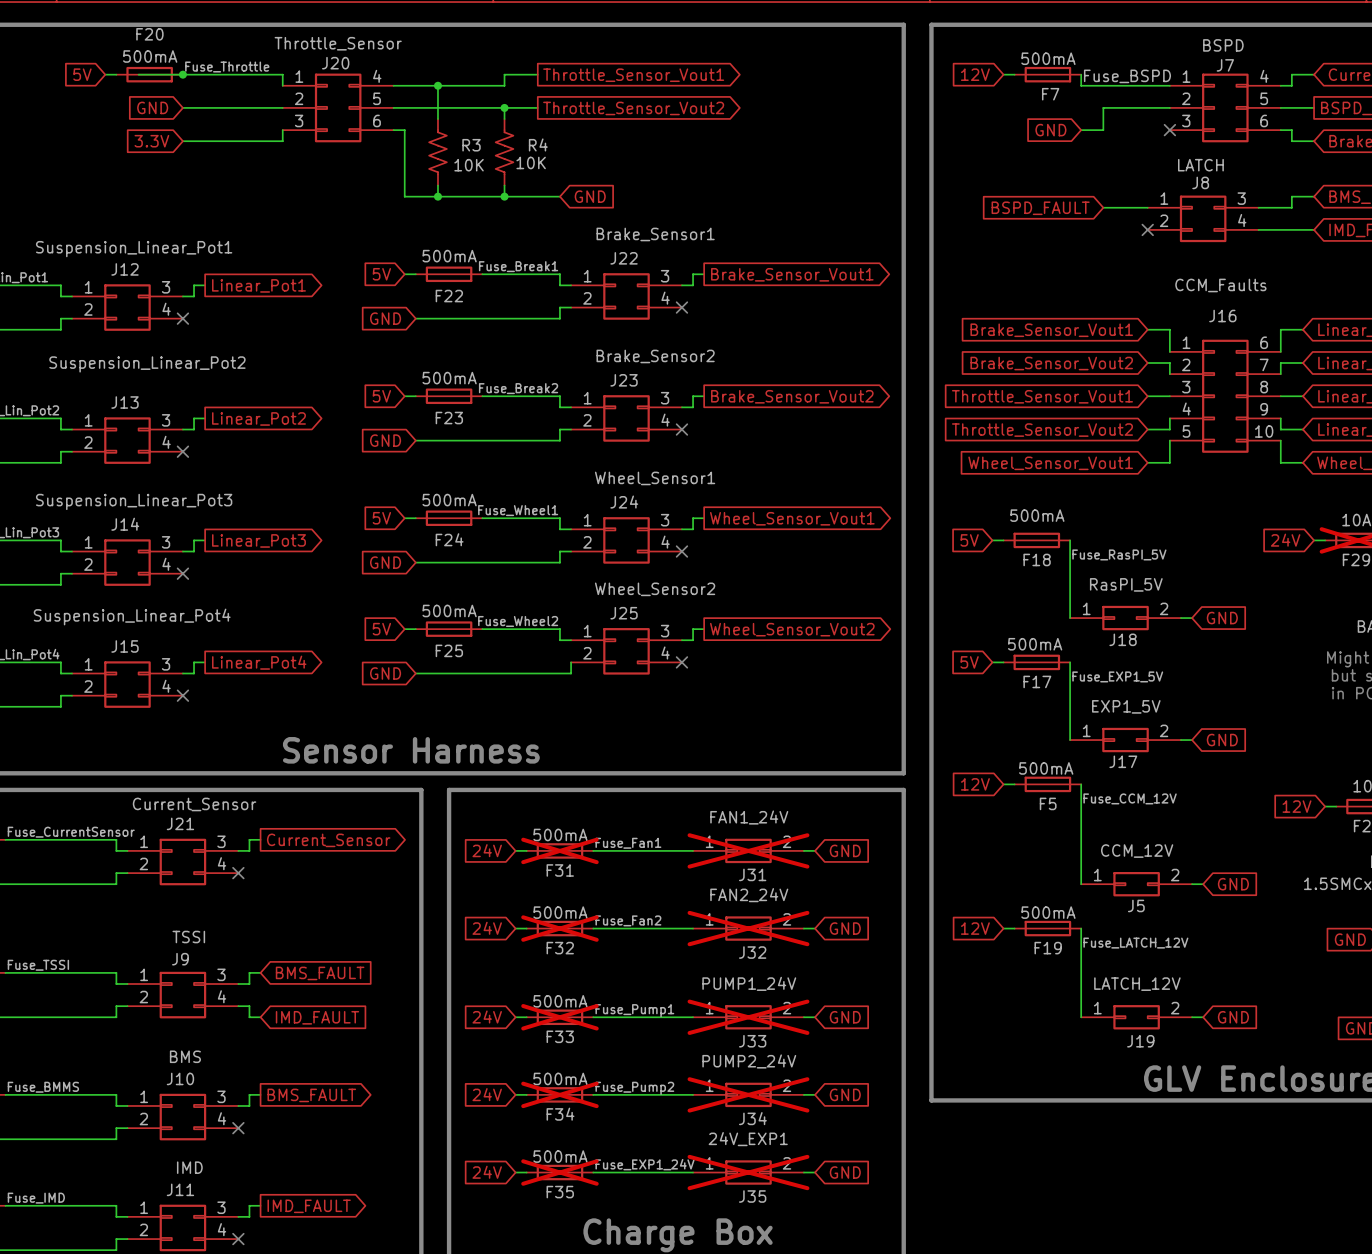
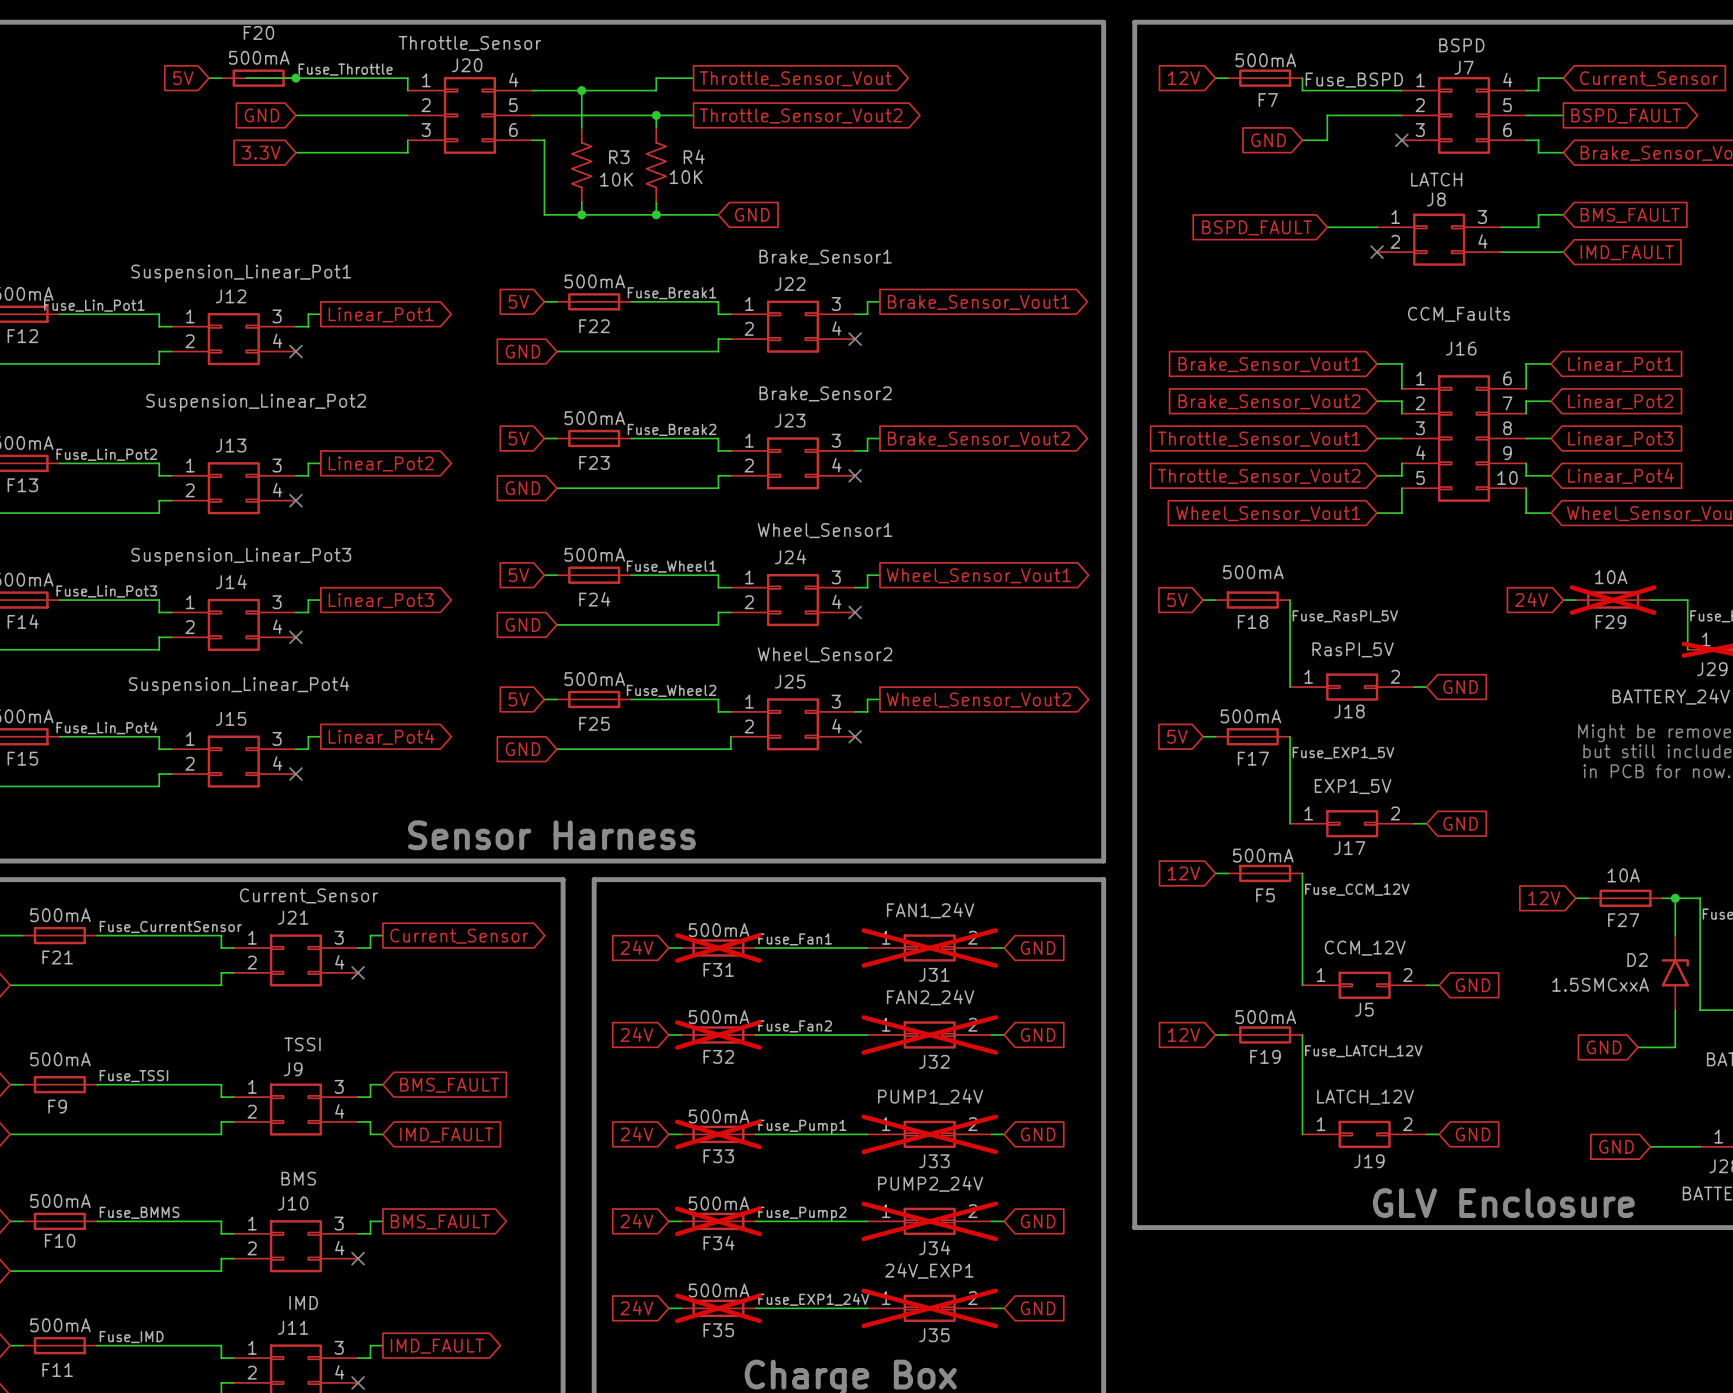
global label: Throttle_Sensor_Vout1 (633, 75) -> Throttle_Sensor_Vout (795, 78)

